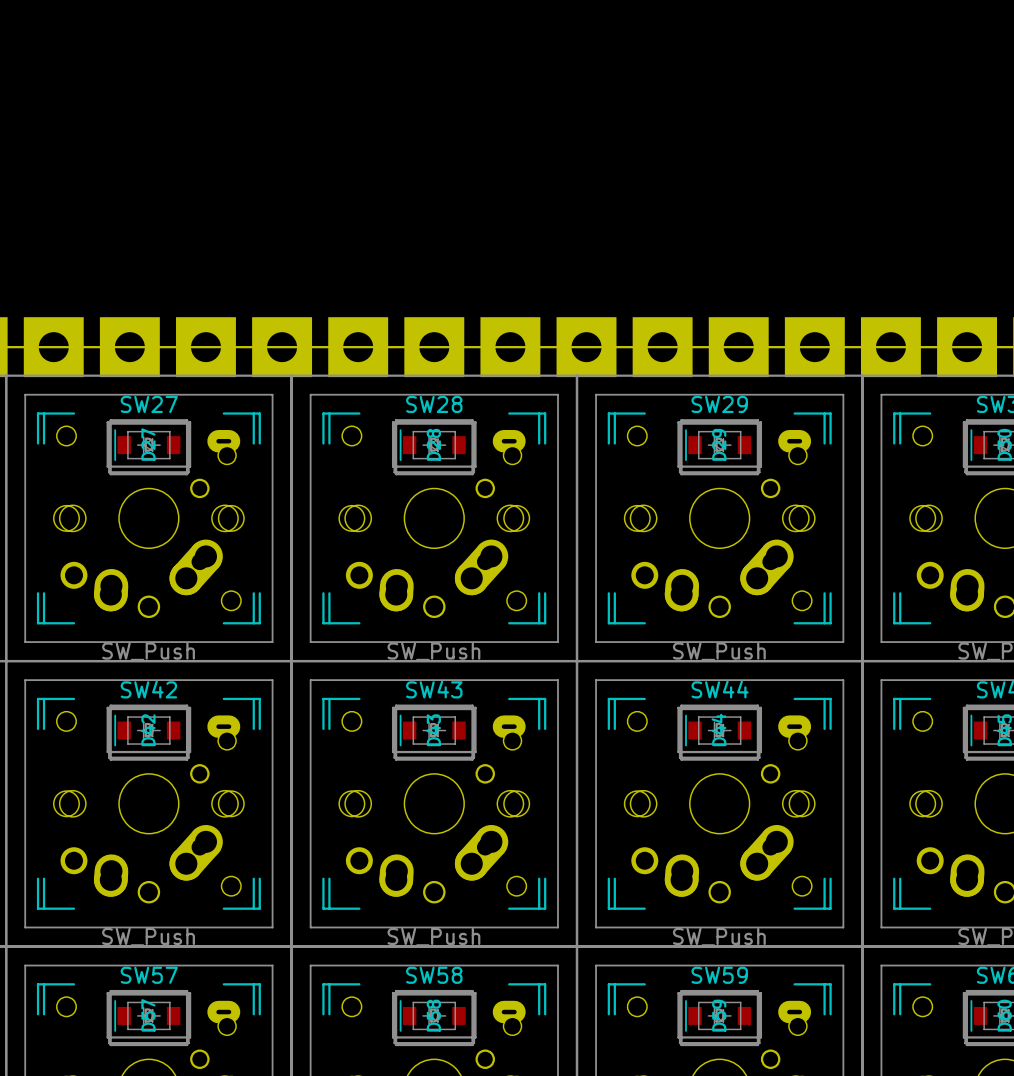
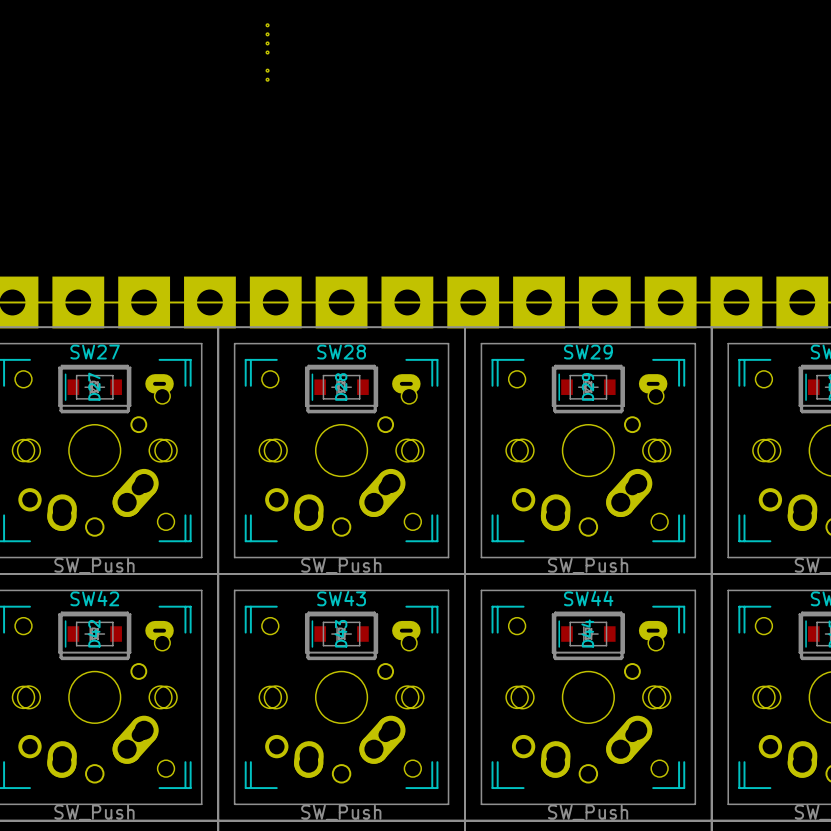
part: none -> (267, 25)
part: none -> (267, 34)
part: none -> (267, 43)
part: none -> (267, 52)
part: none -> (267, 70)
part: none -> (267, 79)

